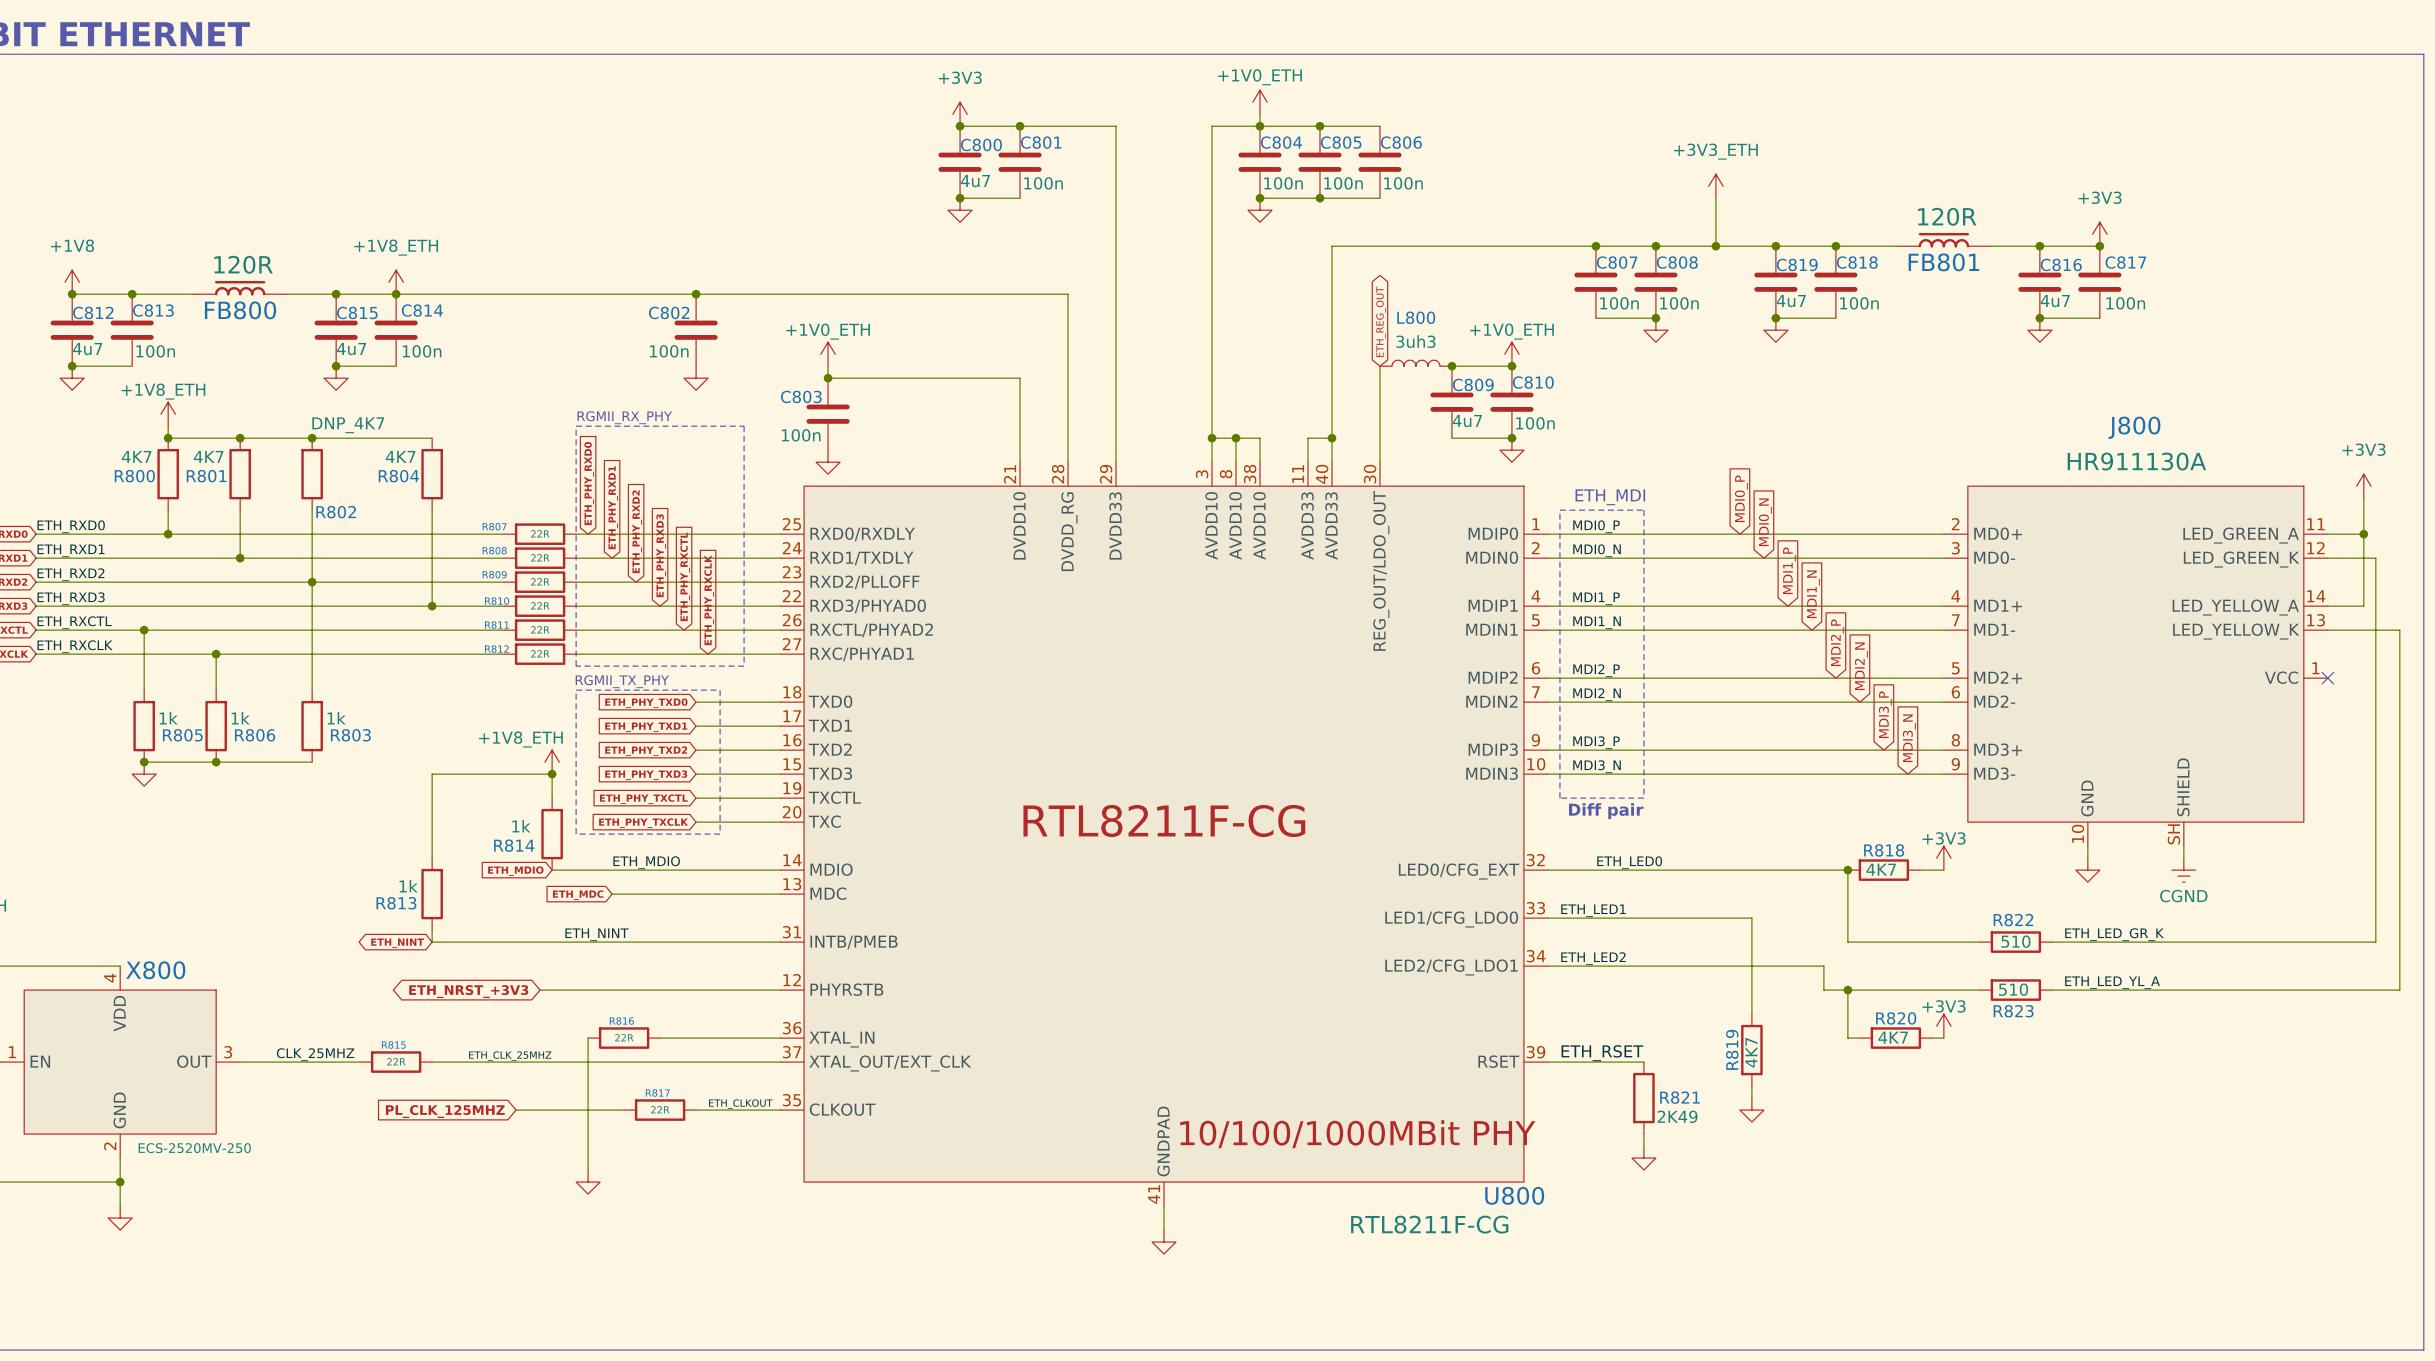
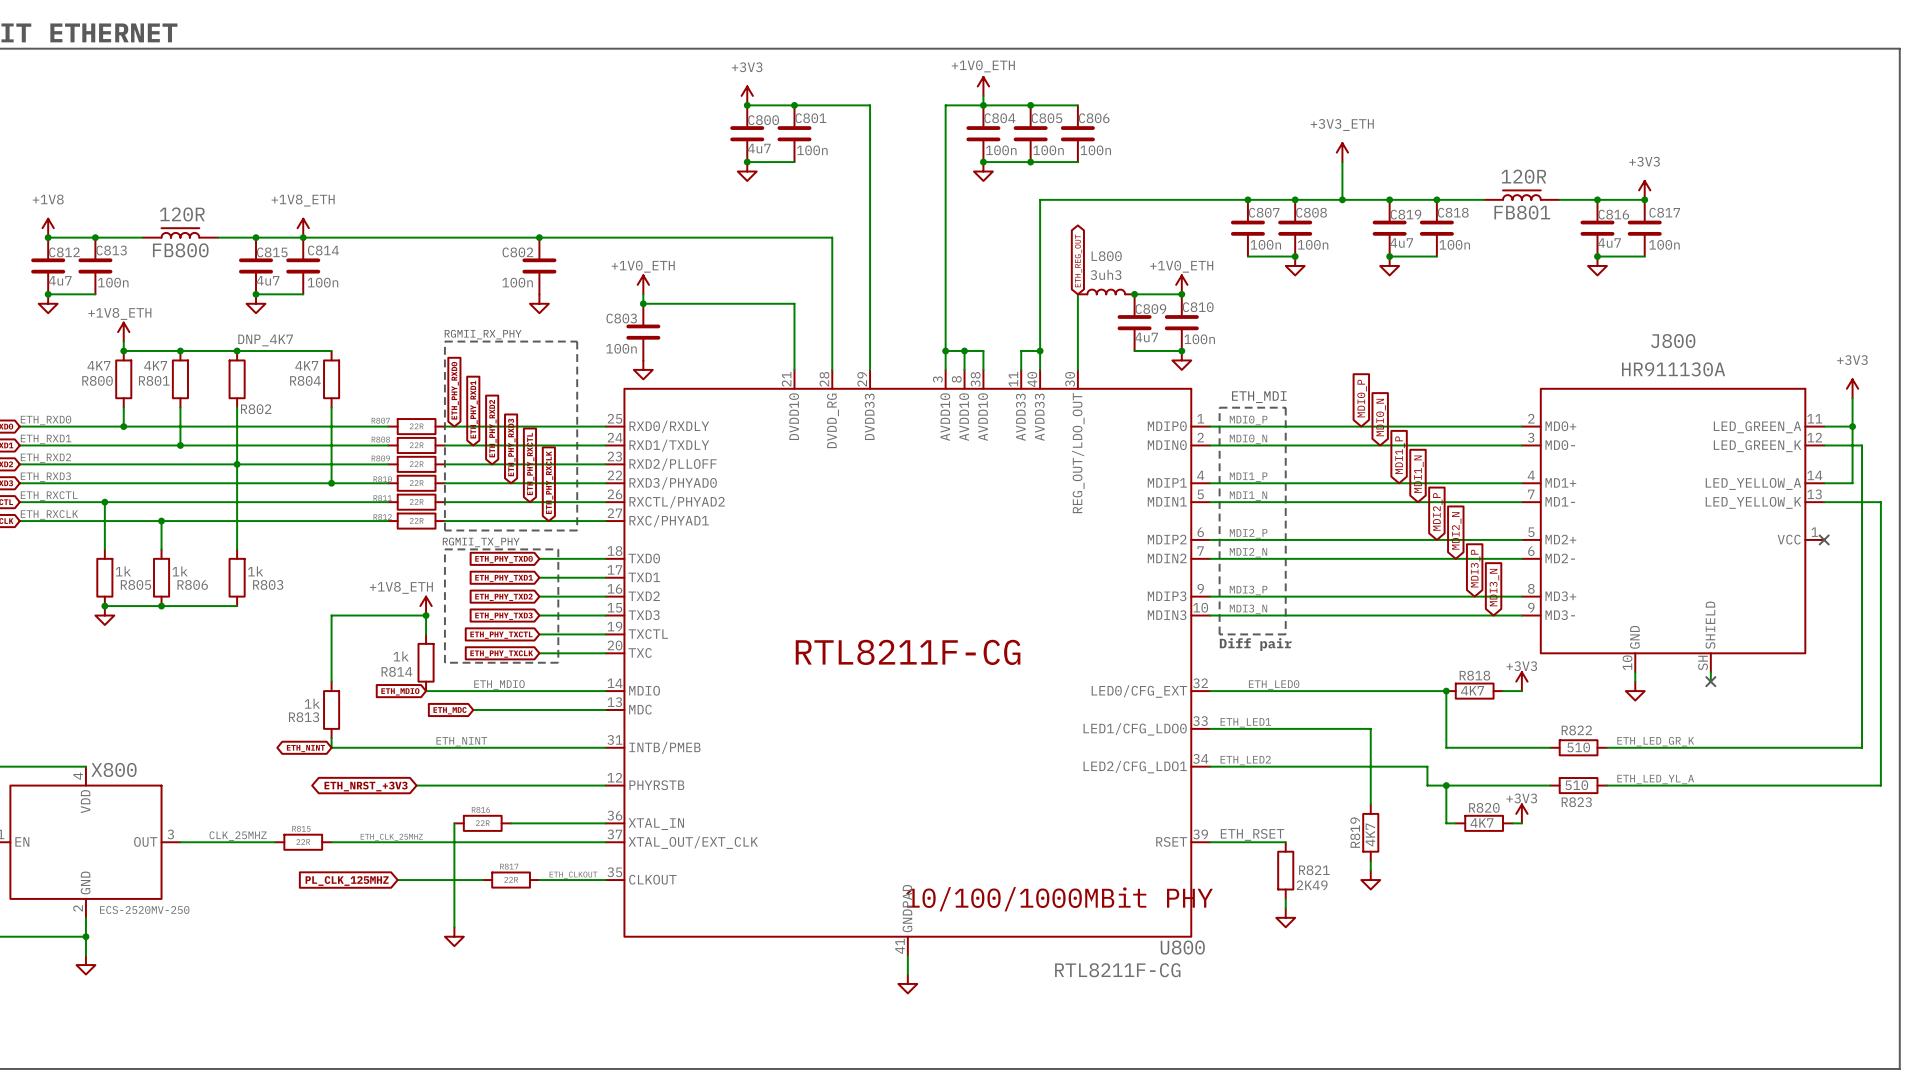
no-connect mark: none -> (1710, 681)
power symbol: CGND (2183, 870) -> none

